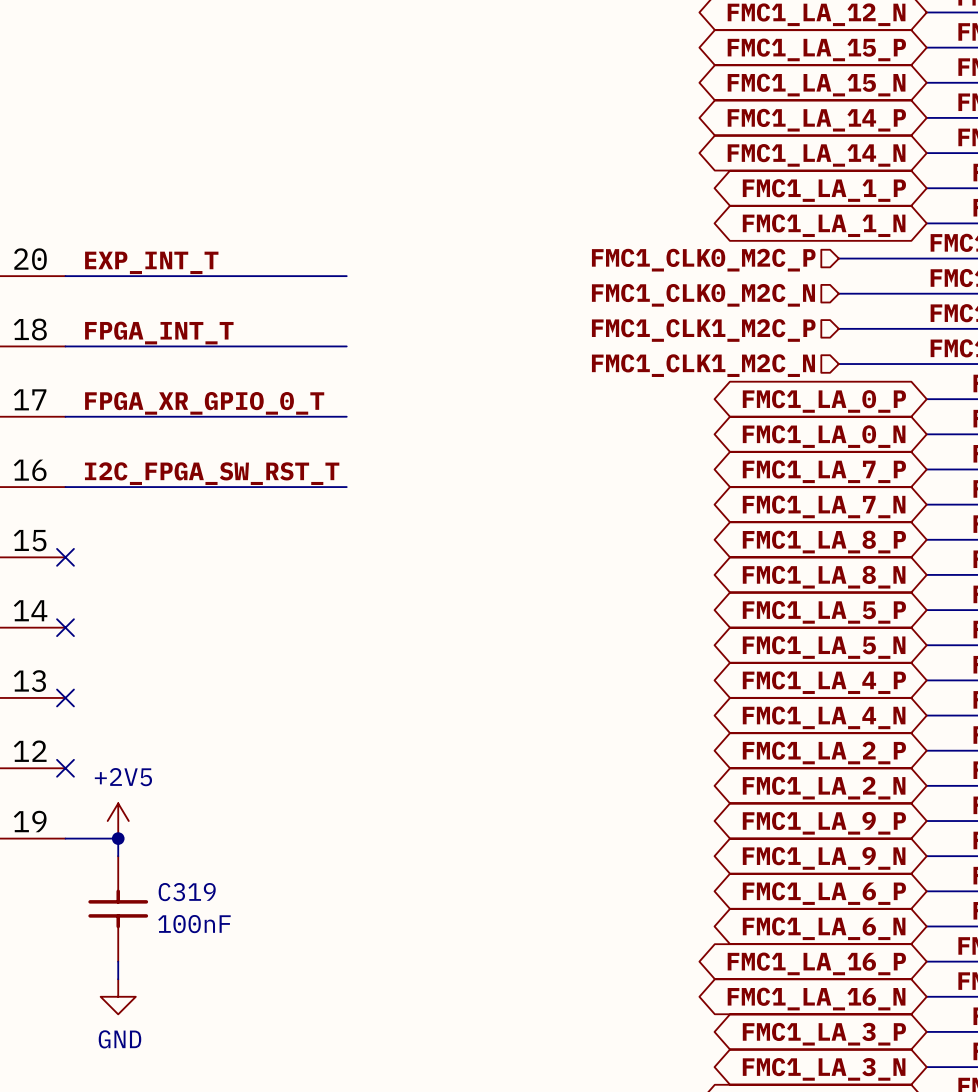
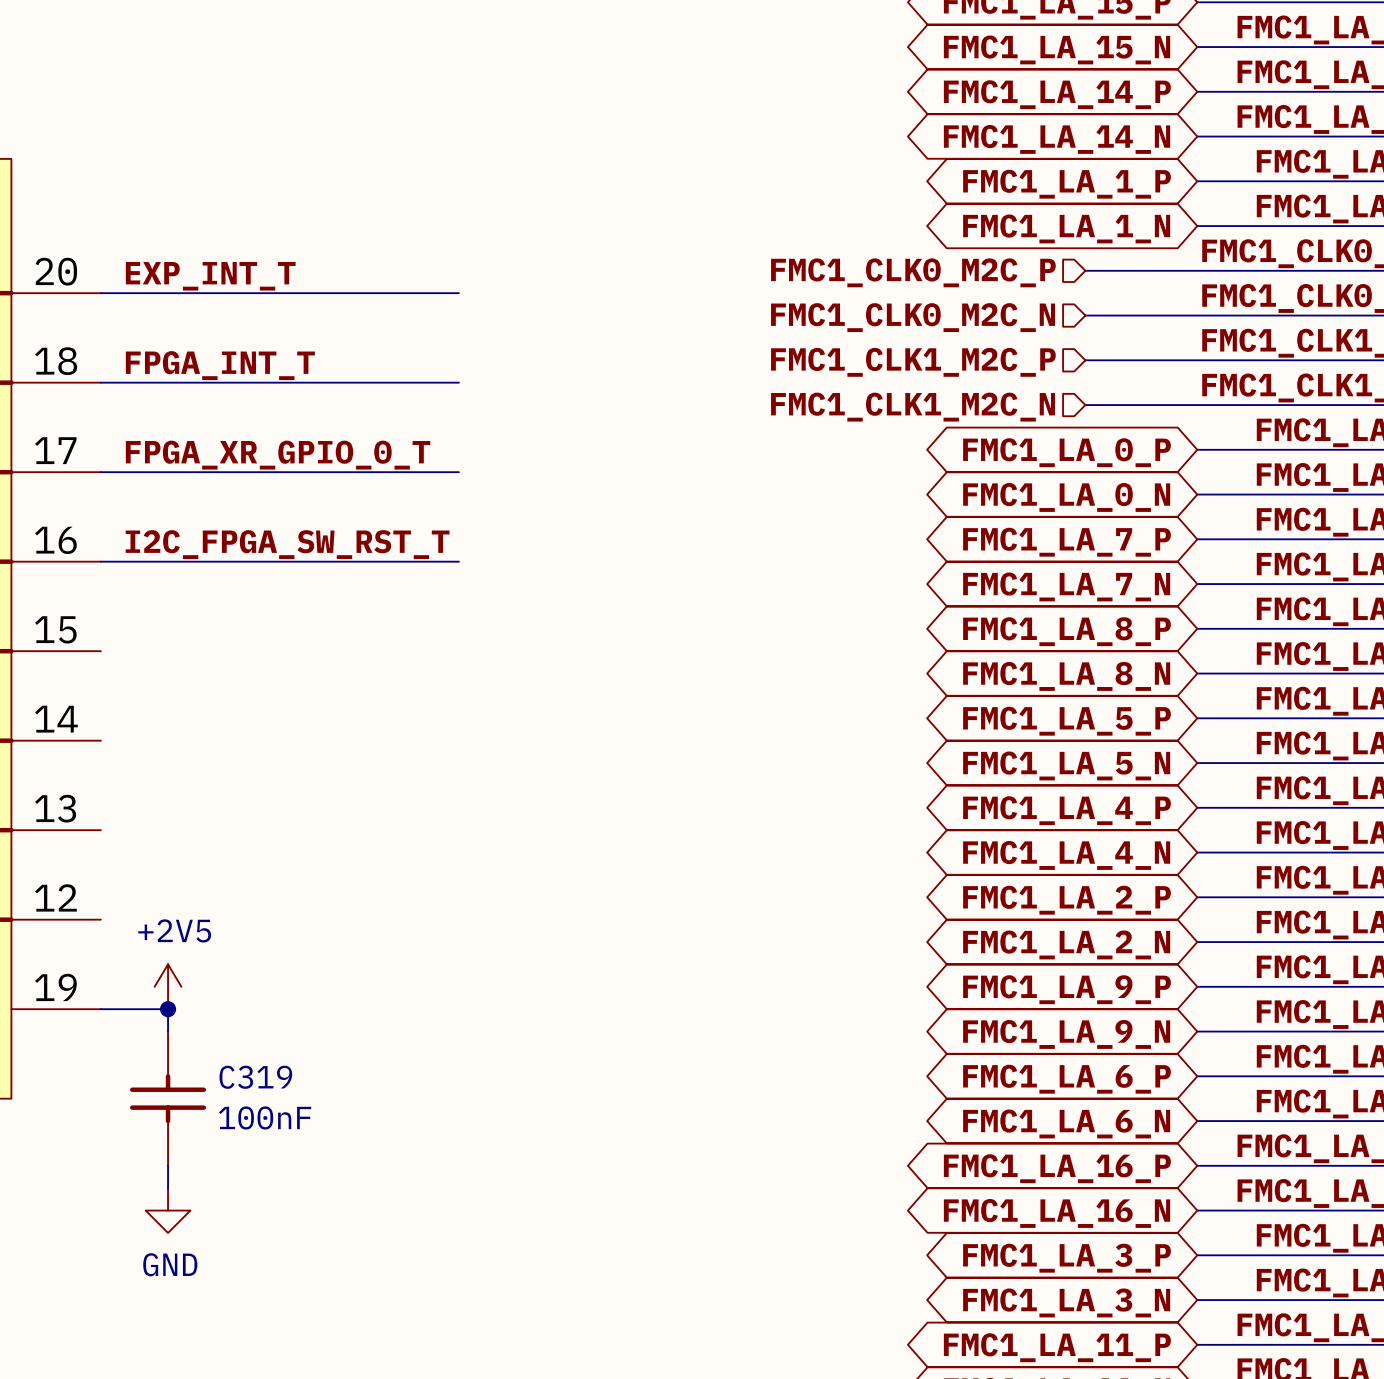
no-connect mark: (65, 557) -> none
no-connect mark: (65, 627) -> none
no-connect mark: (65, 697) -> none
no-connect mark: (65, 768) -> none

